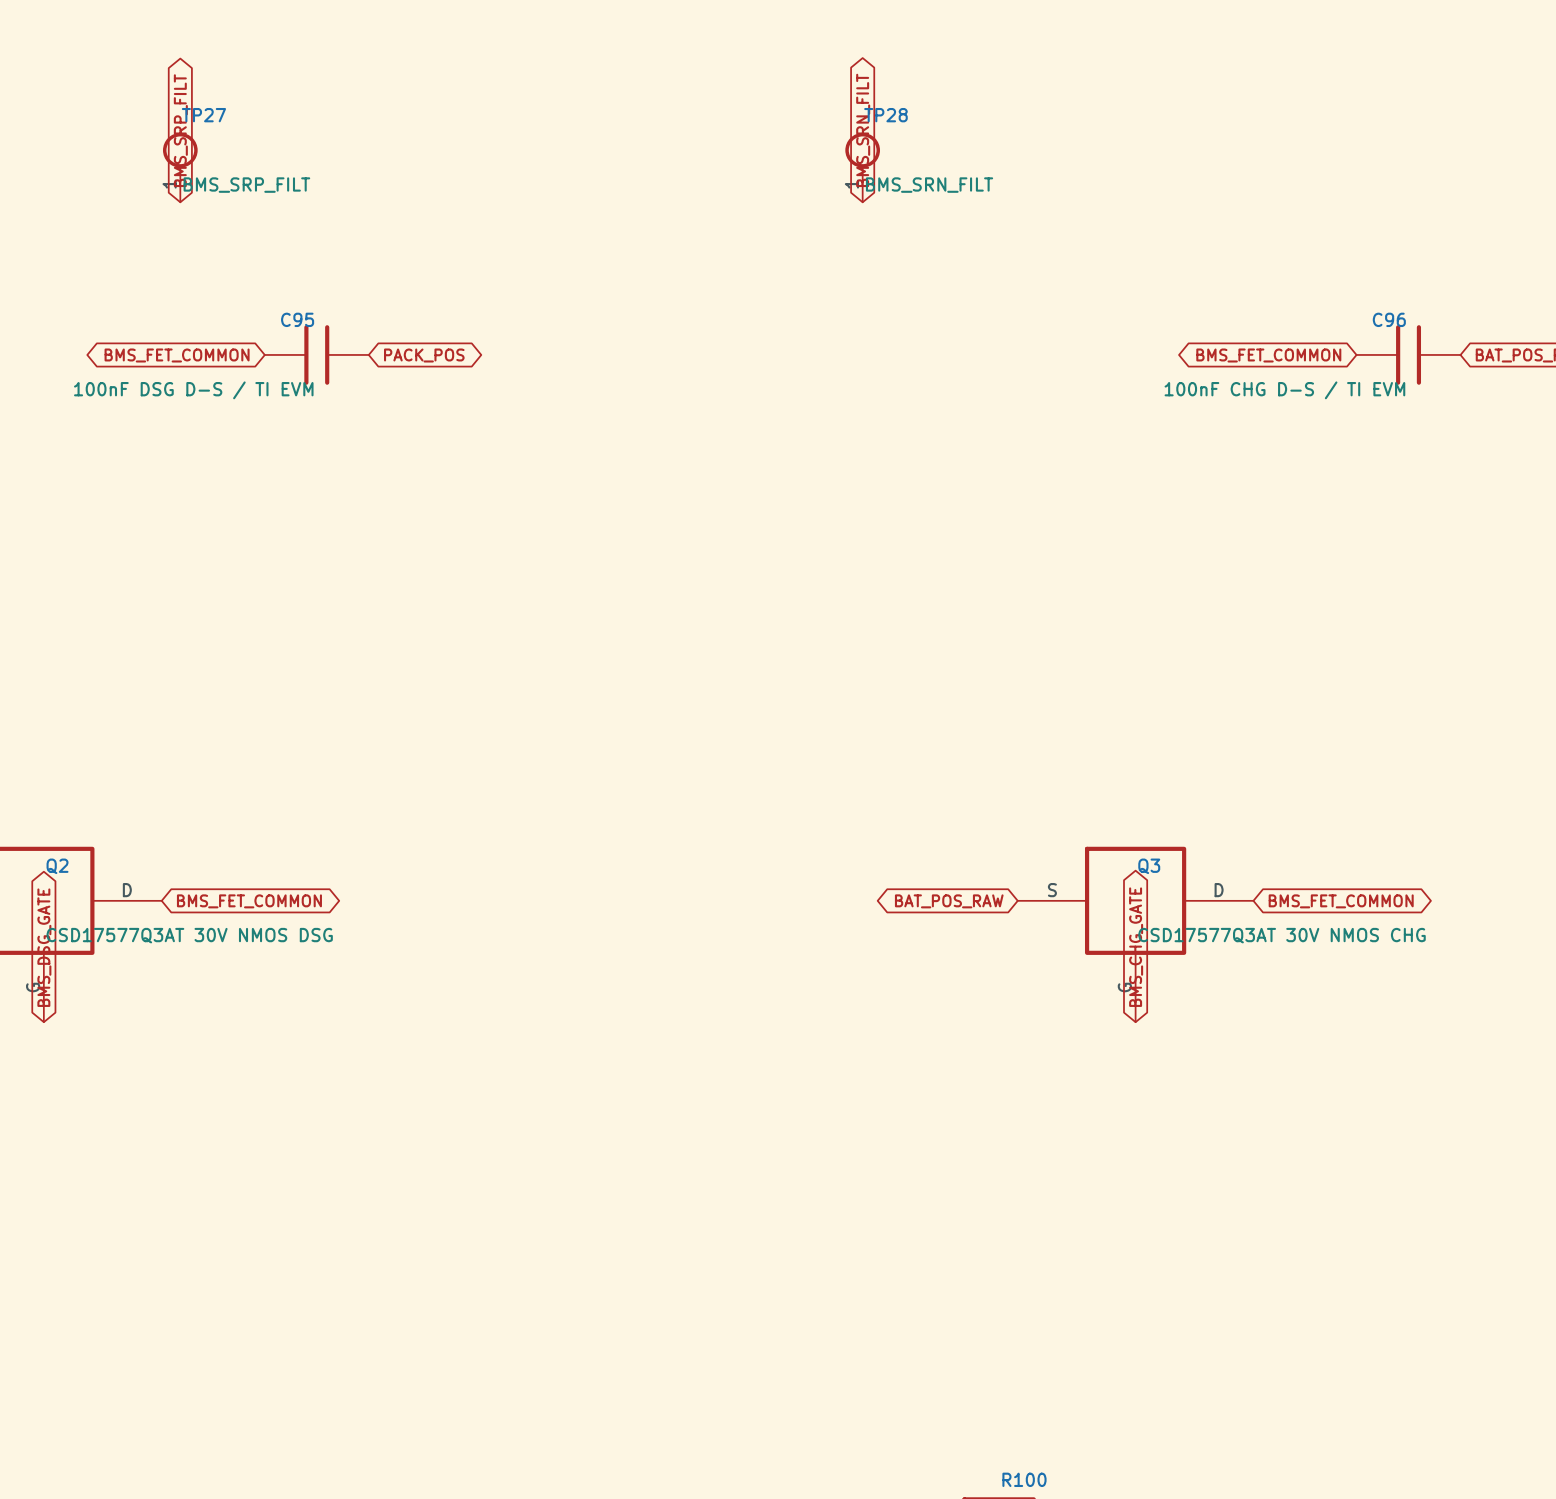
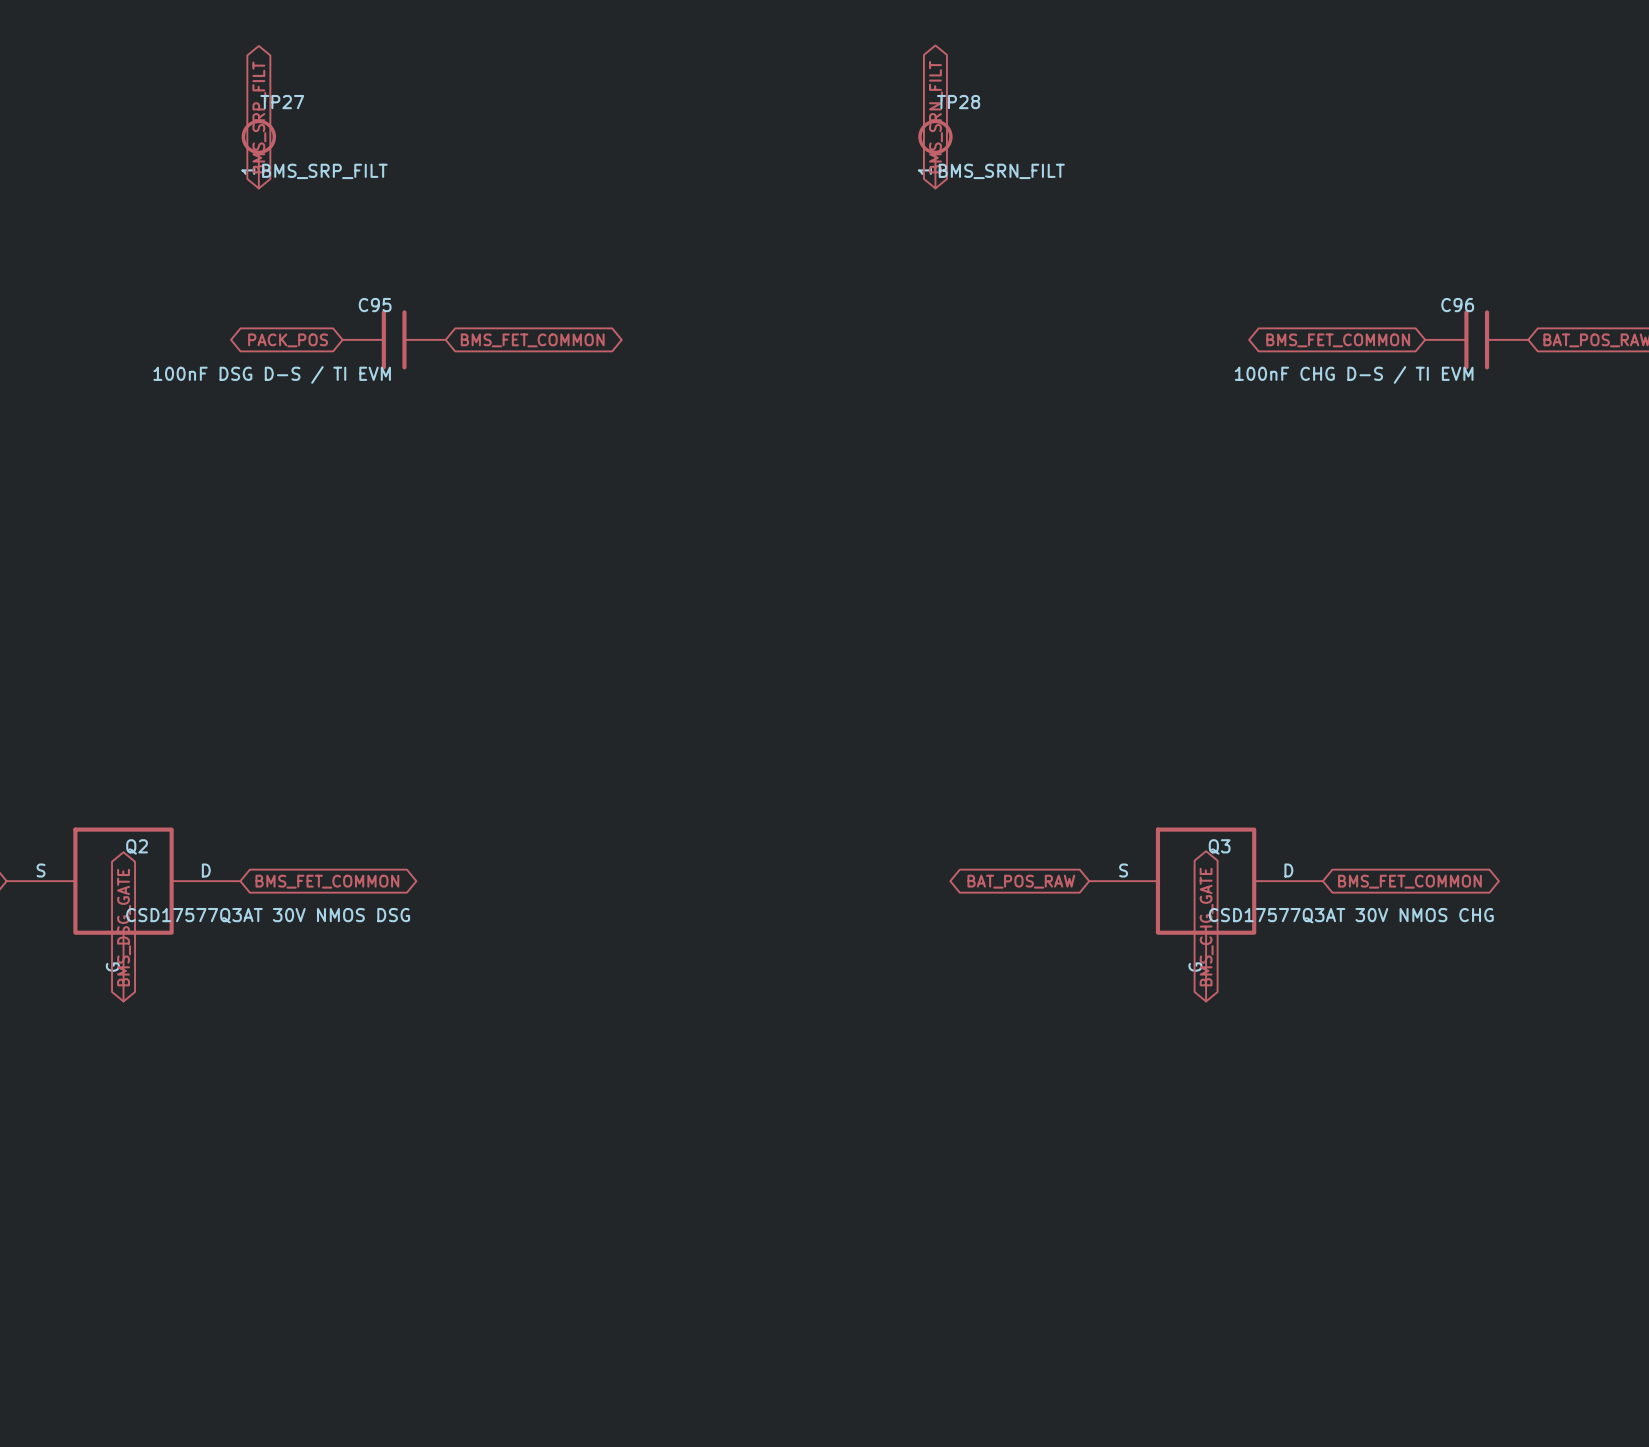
global label: BMS_FET_COMMON (177, 355) -> PACK_POS (288, 340)
global label: PACK_POS (424, 355) -> BMS_FET_COMMON (532, 340)

